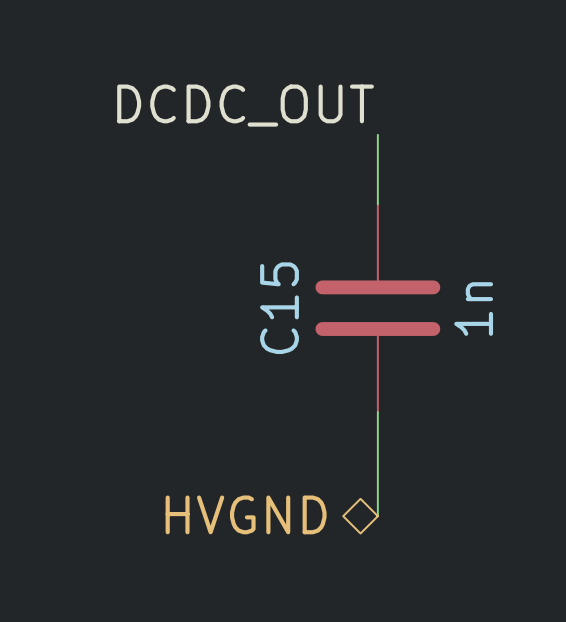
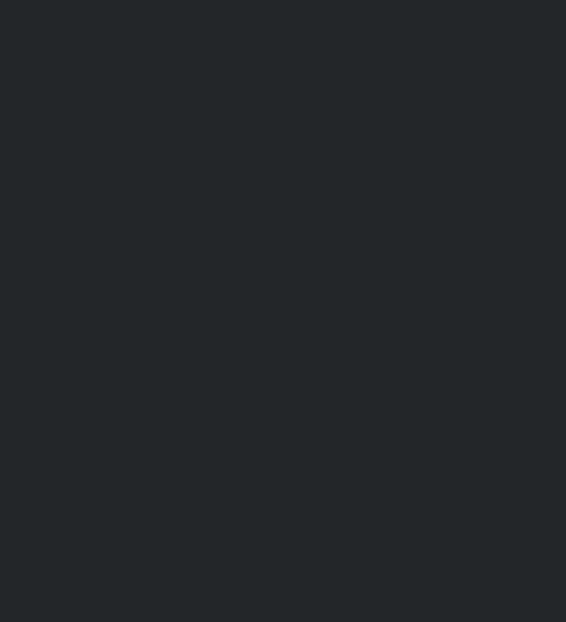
label: DCDC_OUT (245, 105) -> none
wire: (377, 134) (377, 204) -> none
C15: 1n (377, 308) -> none
wire: (377, 412) (377, 516) -> none
hierarchical label: HVGND (246, 514) -> none

